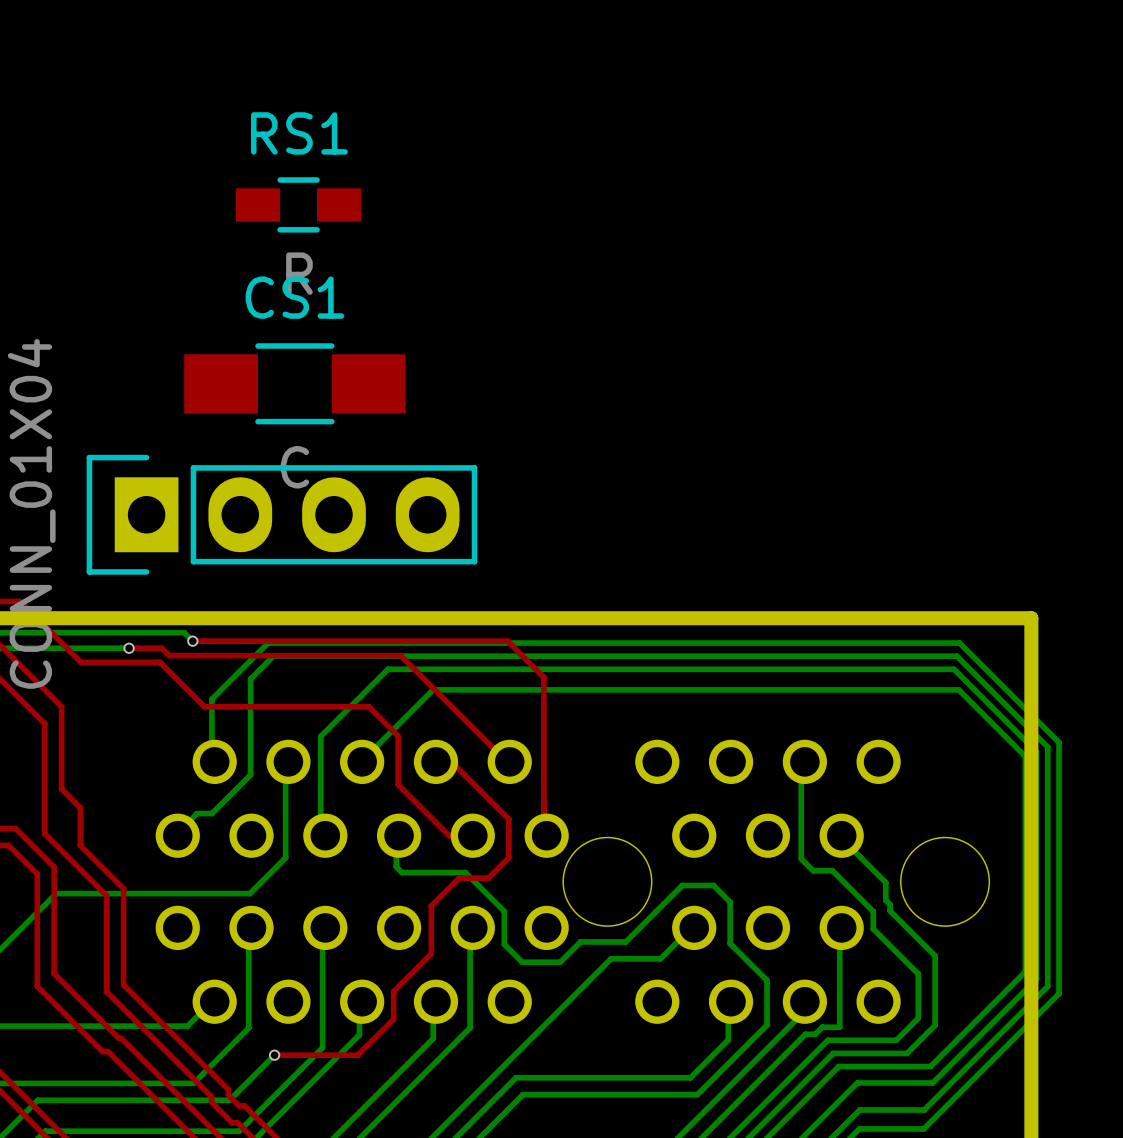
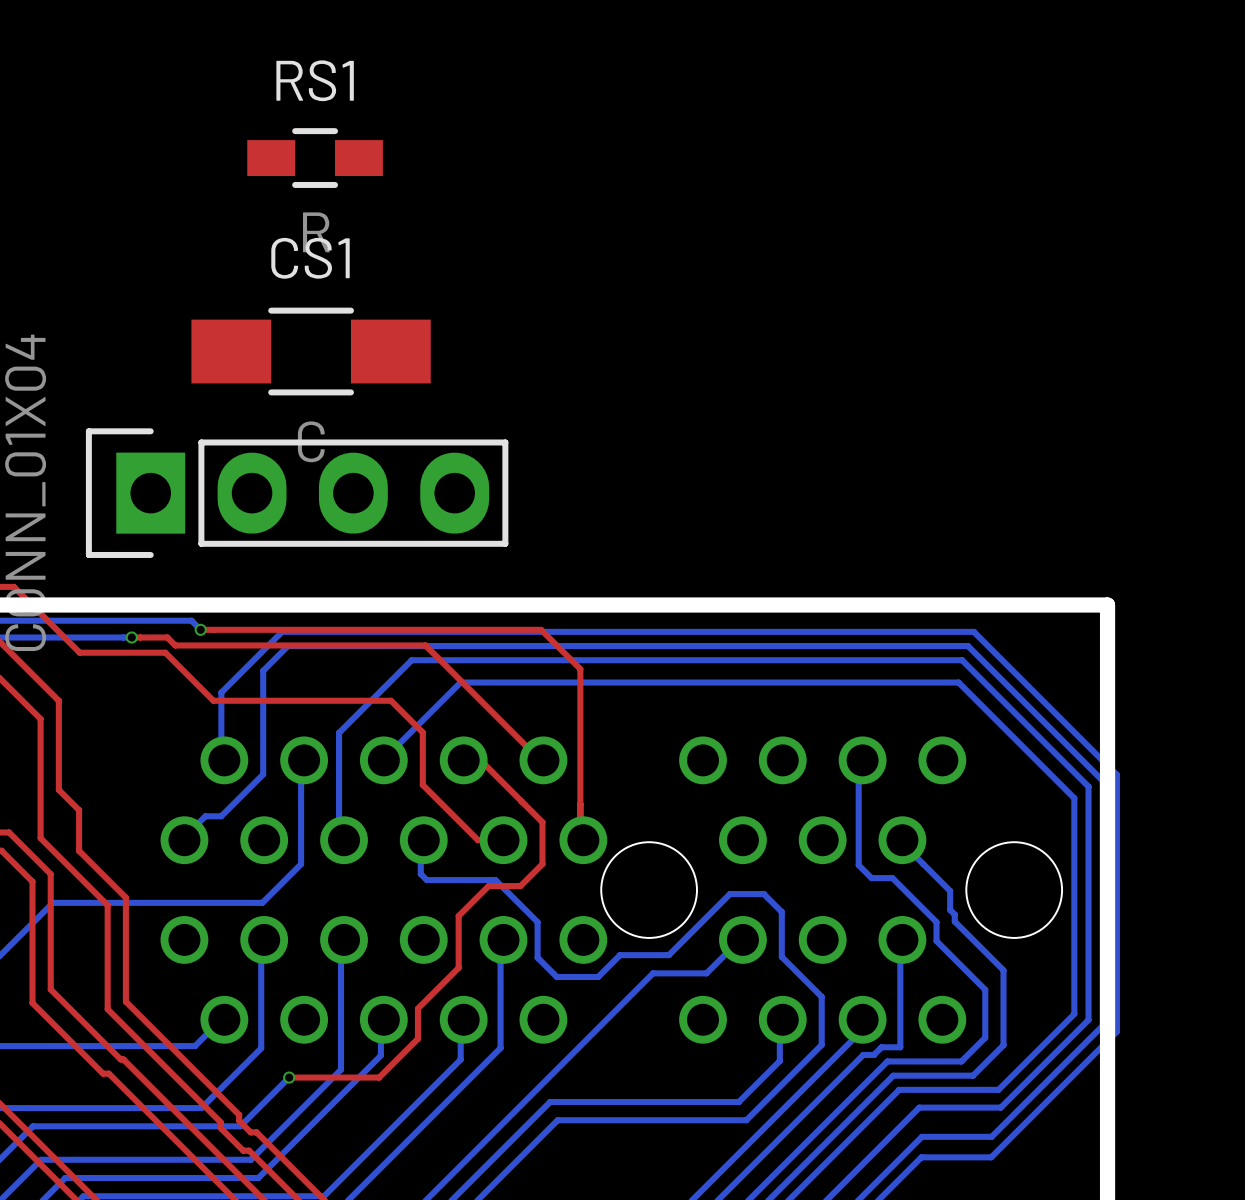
bottom track: (907, 643) (959, 643) (1059, 742) (1059, 993) (1040, 1012) -> (973, 631) (1116, 774) (1116, 1031)
bottom track: (902, 656) (956, 656) (1047, 747) (1047, 986) (1026, 1007) -> (967, 646) (1102, 780) (1102, 1025)
bottom track: (896, 669) (954, 669) (1036, 751) (1036, 979) (1013, 1001) -> (962, 660) (1088, 786) (1088, 1019)
bottom track: (893, 689) (958, 689) (1025, 756) (1025, 971) (1000, 996) -> (958, 682) (1074, 798) (1074, 1014)

